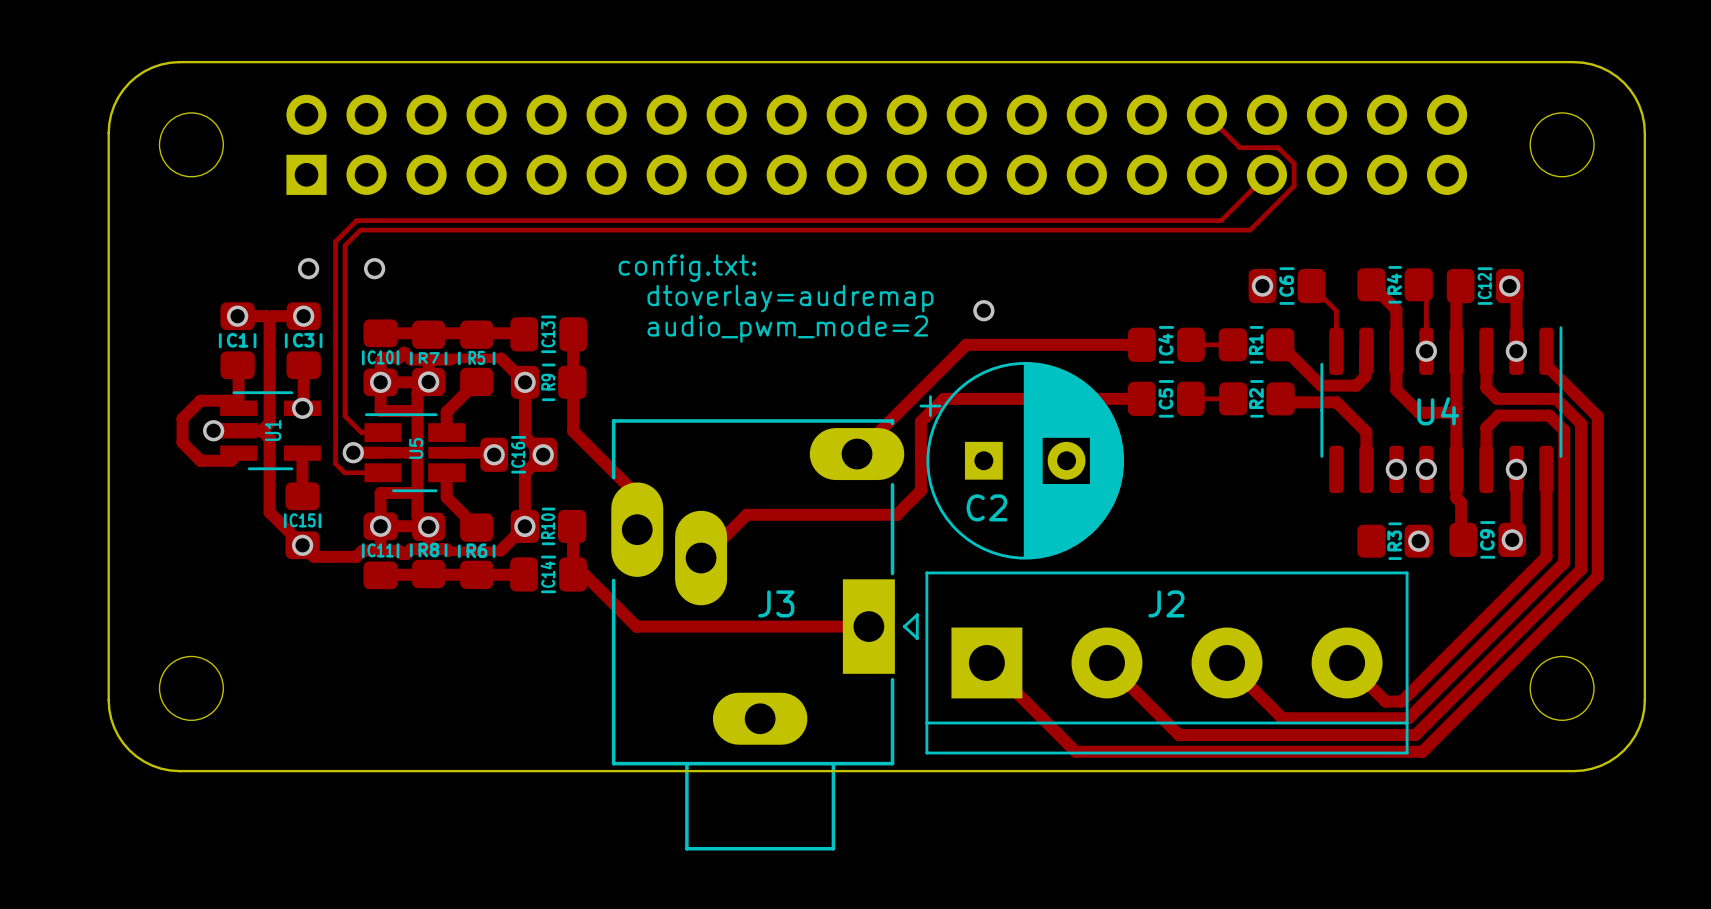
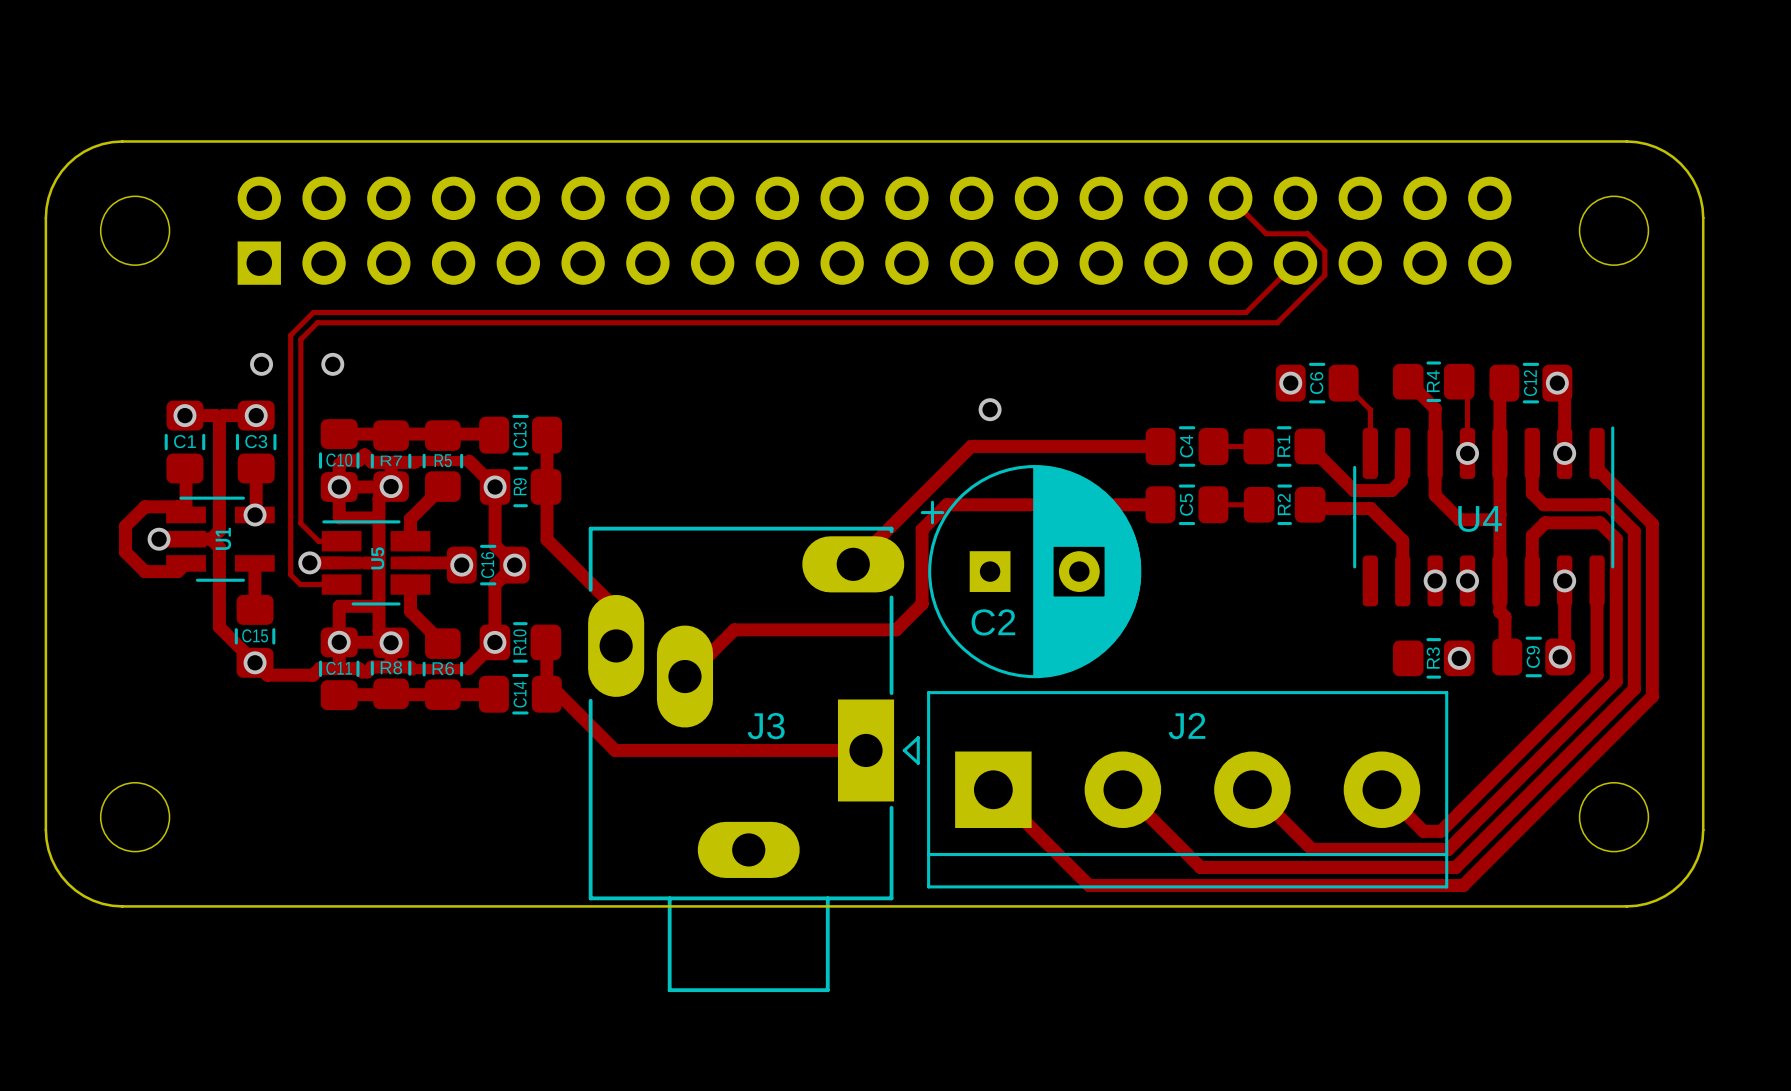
text: config.txt: (687, 268) -> none
text: dtoverlay=audremap (790, 298) -> none
text: audio_pwm_mode=2 (787, 329) -> none

